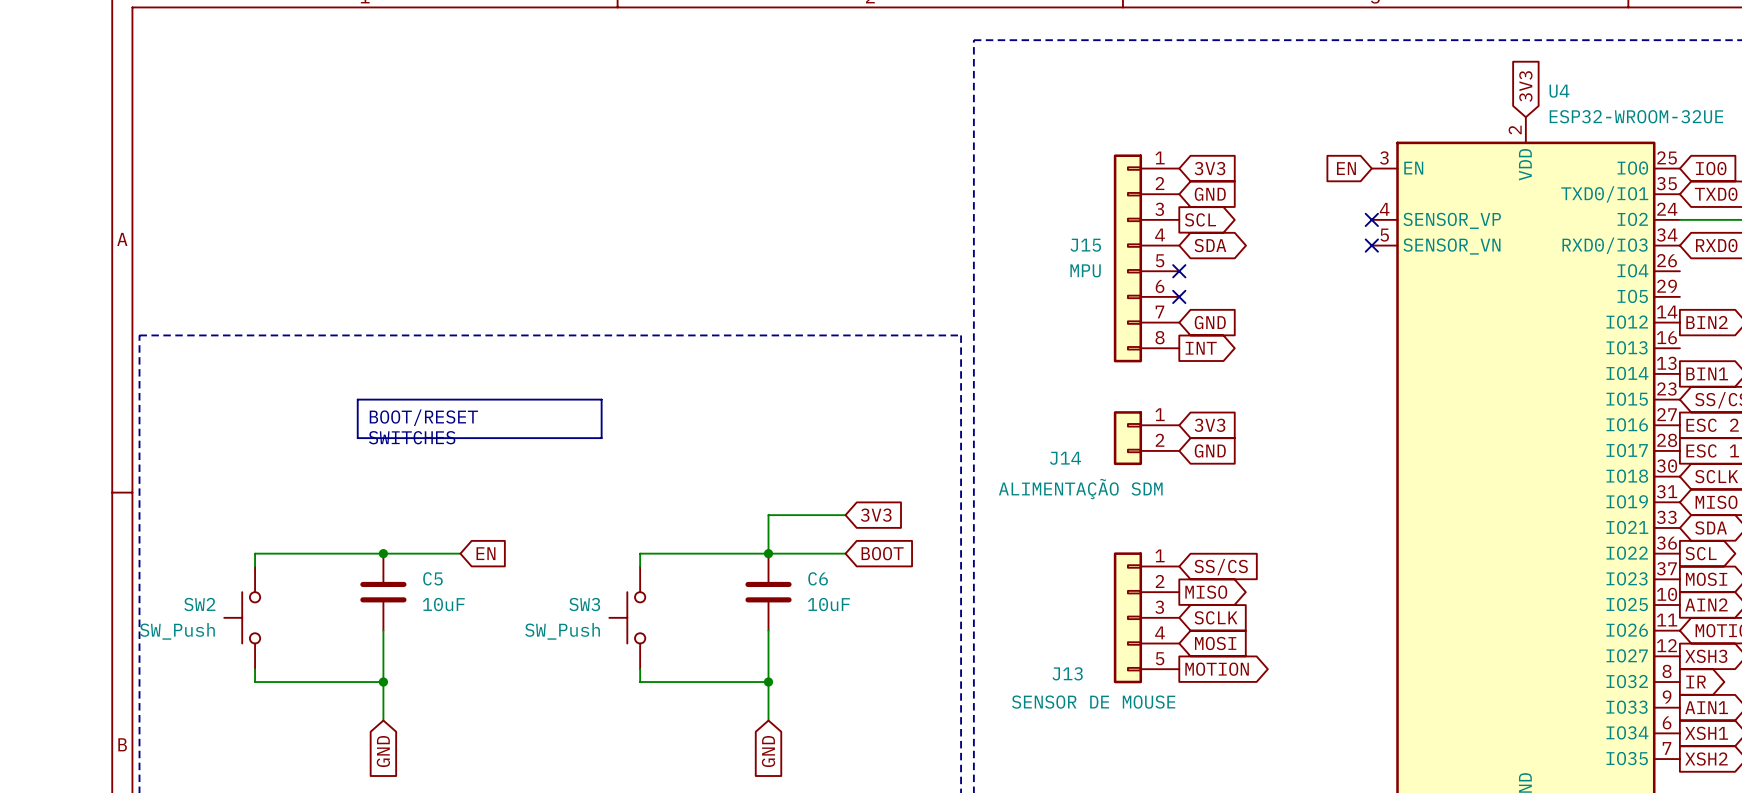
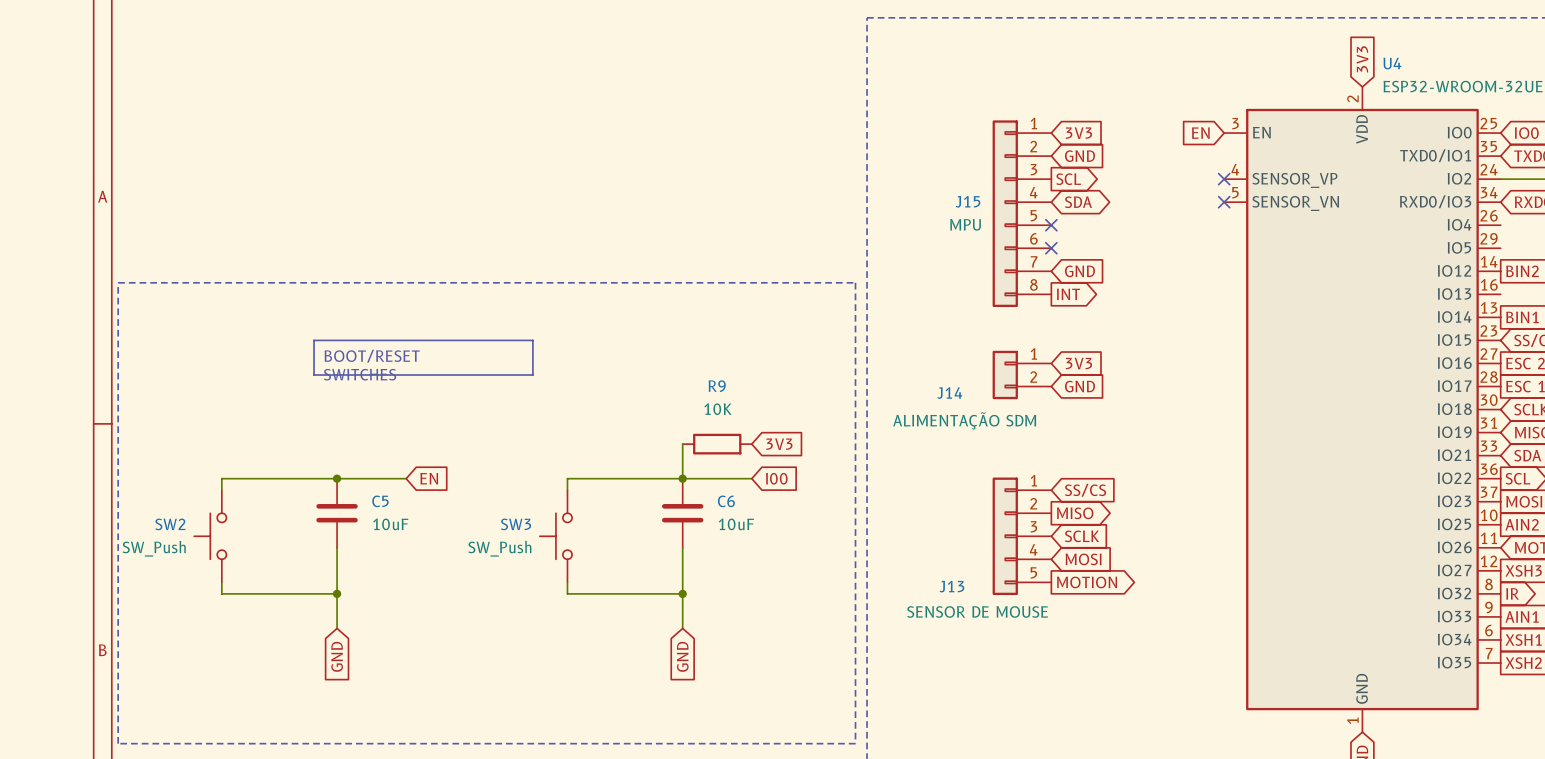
wire: (768, 515) (845, 515) -> none
R9: none -> 10K (717, 444)
global label: BOOT (882, 553) -> I00 (776, 478)

